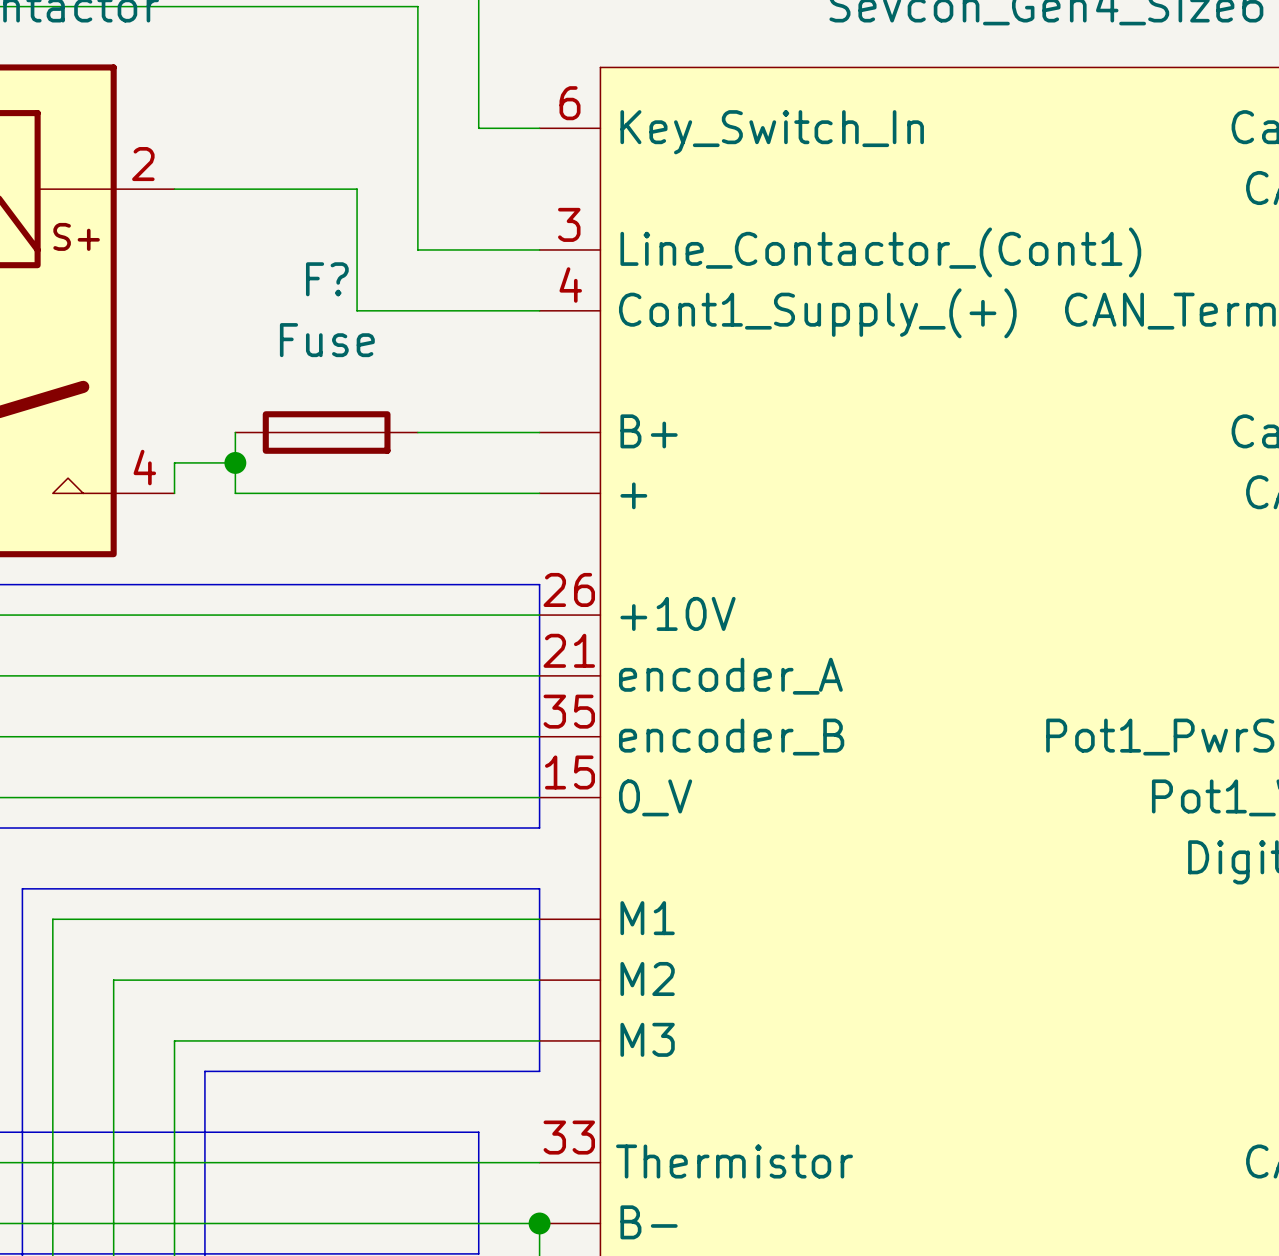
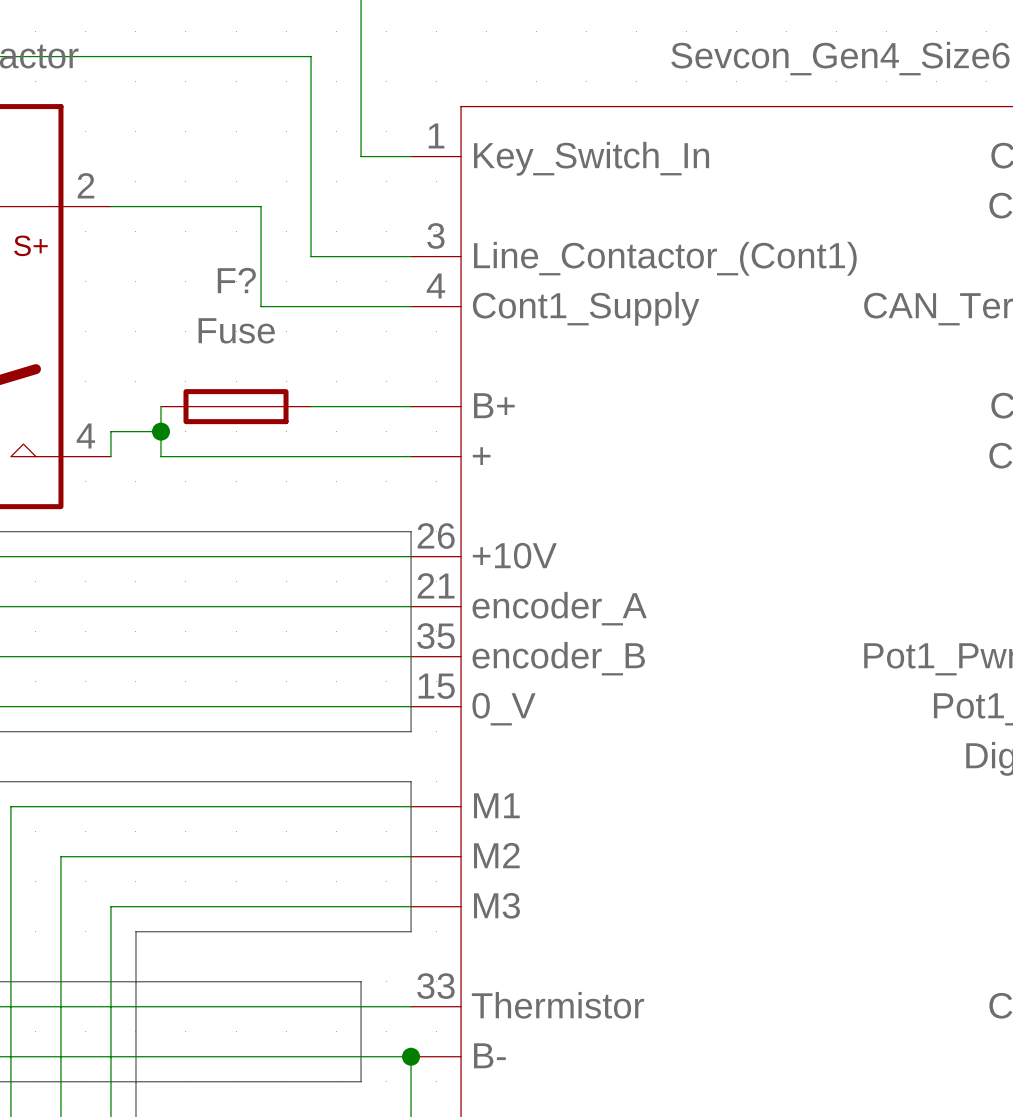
part pin number: 6 (570, 103) -> 1 (436, 135)
part pin name: Cont1_Supply_(+) (817, 313) -> Cont1_Supply (586, 308)

